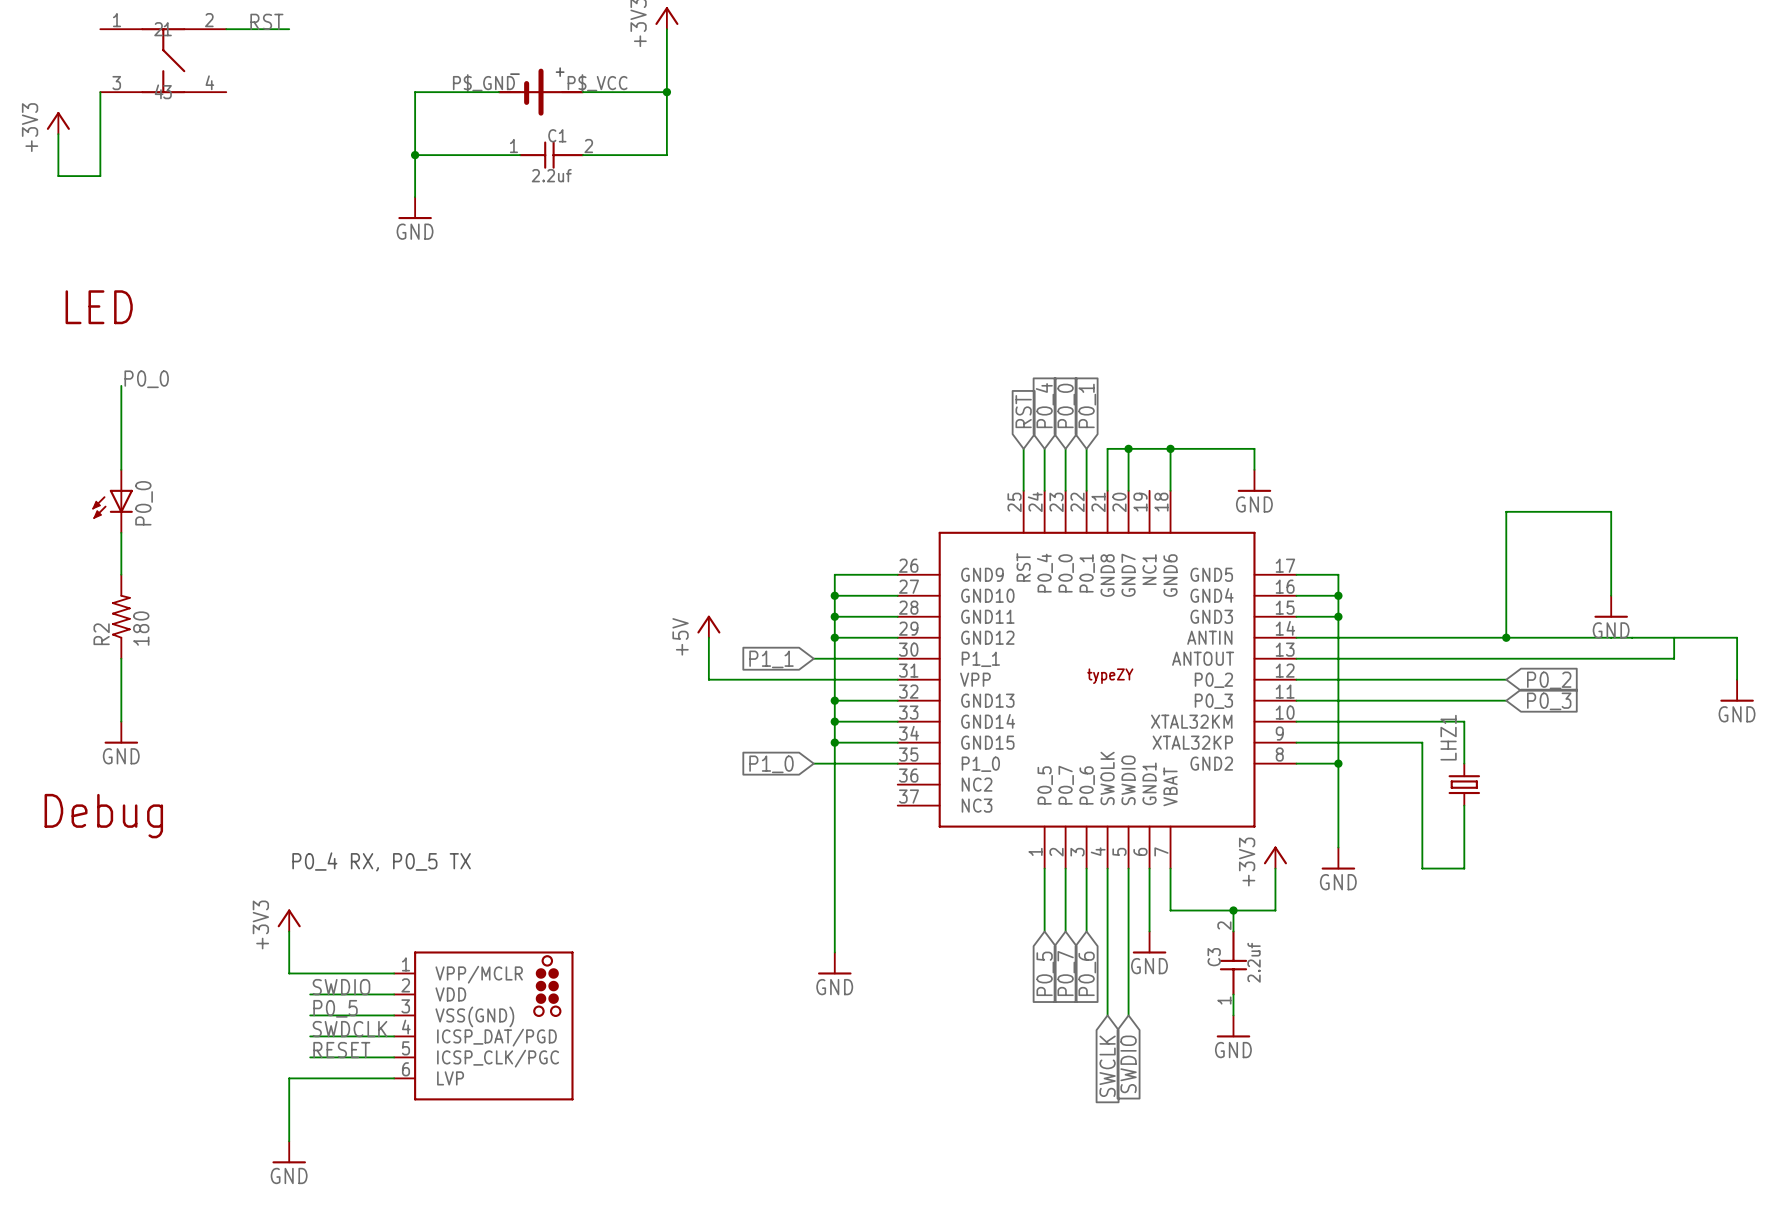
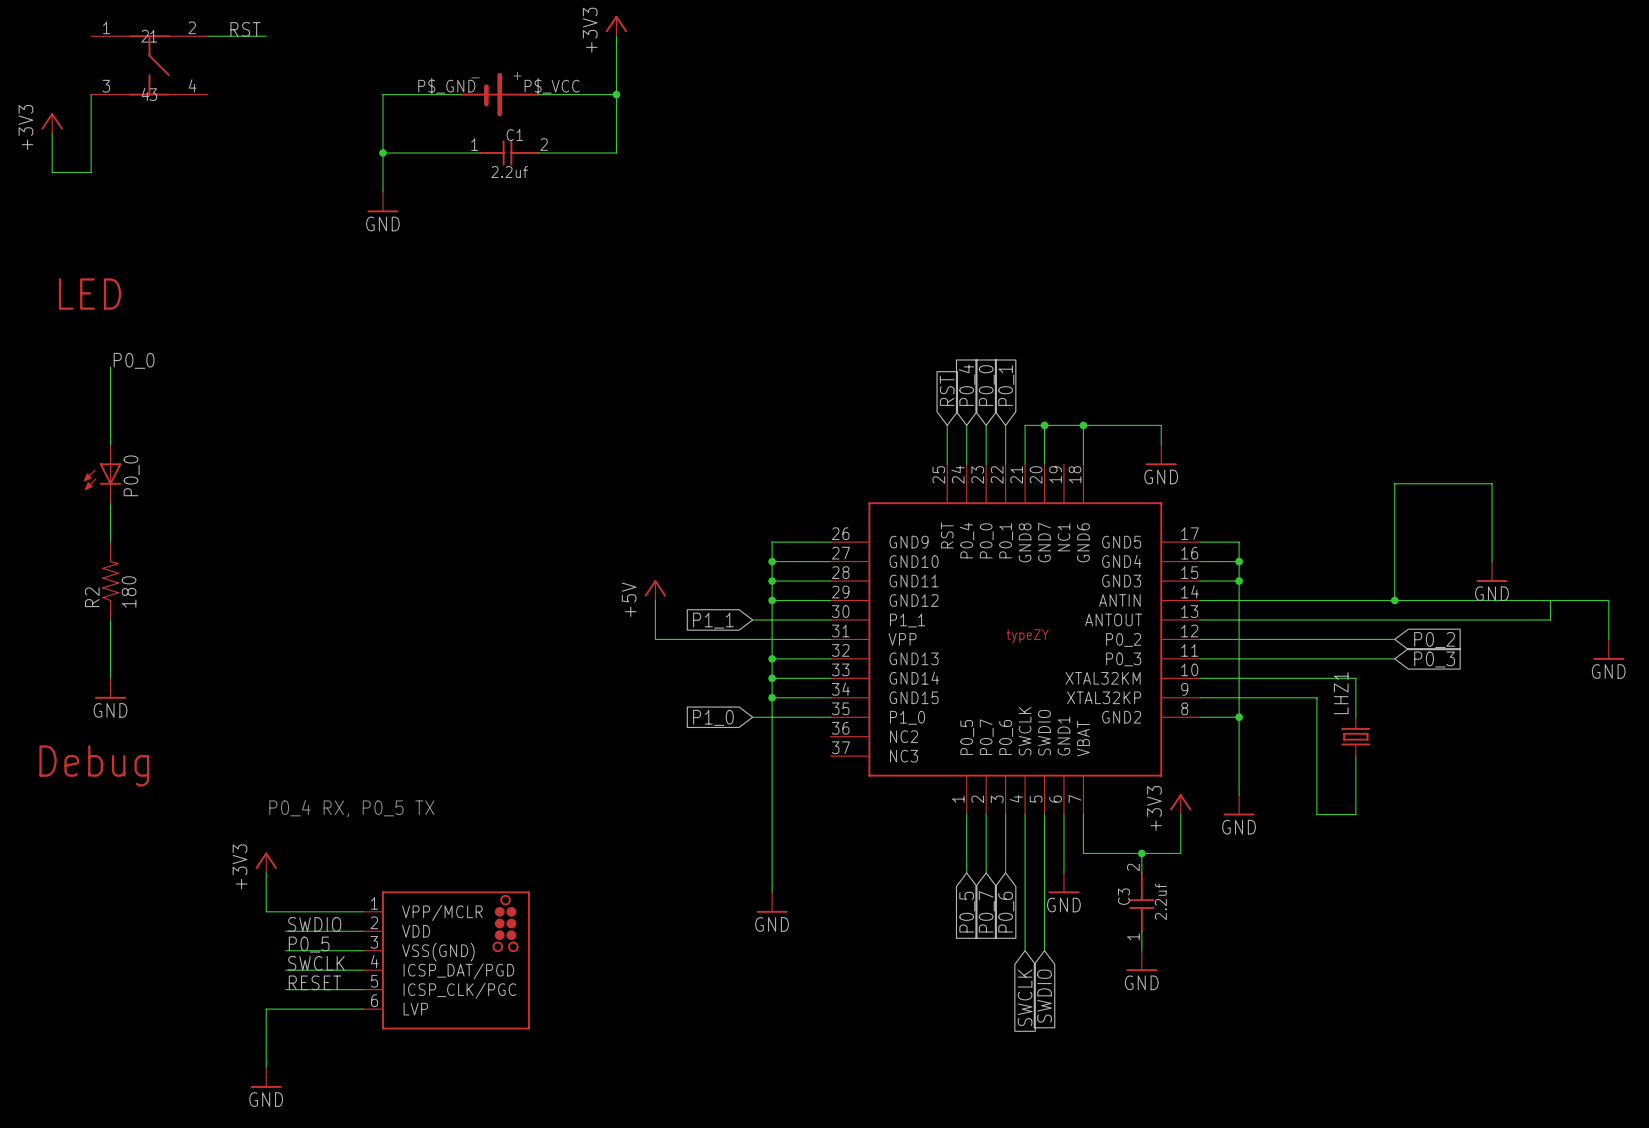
part pin name: SWOLK (1107, 778) -> SWCLK (1025, 731)
label: SWDCLK (349, 1029) -> SWCLK (316, 963)

